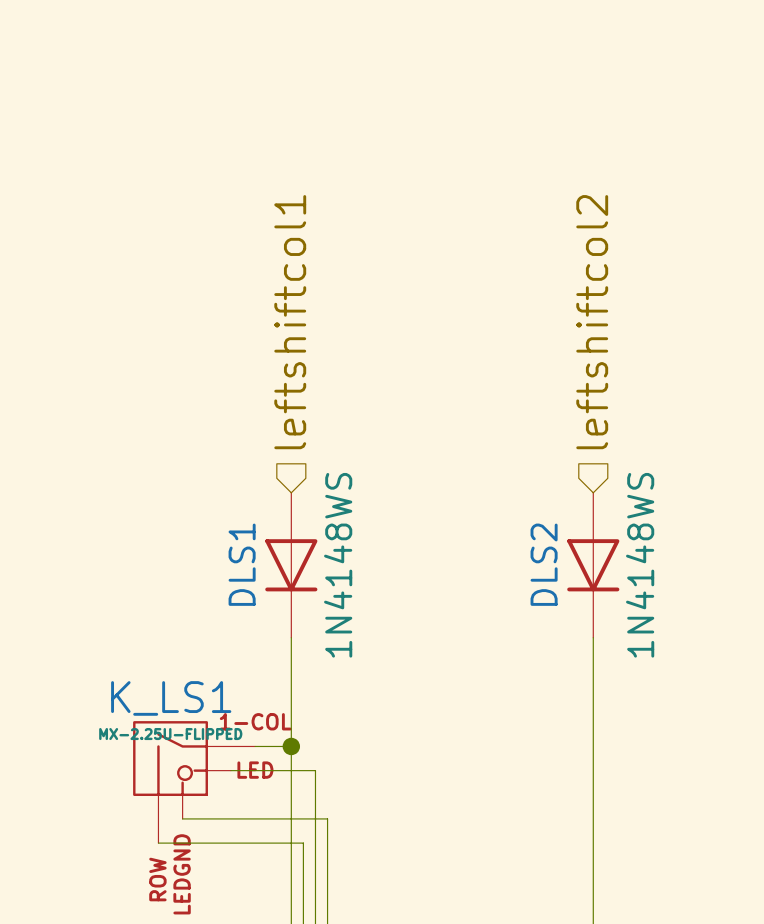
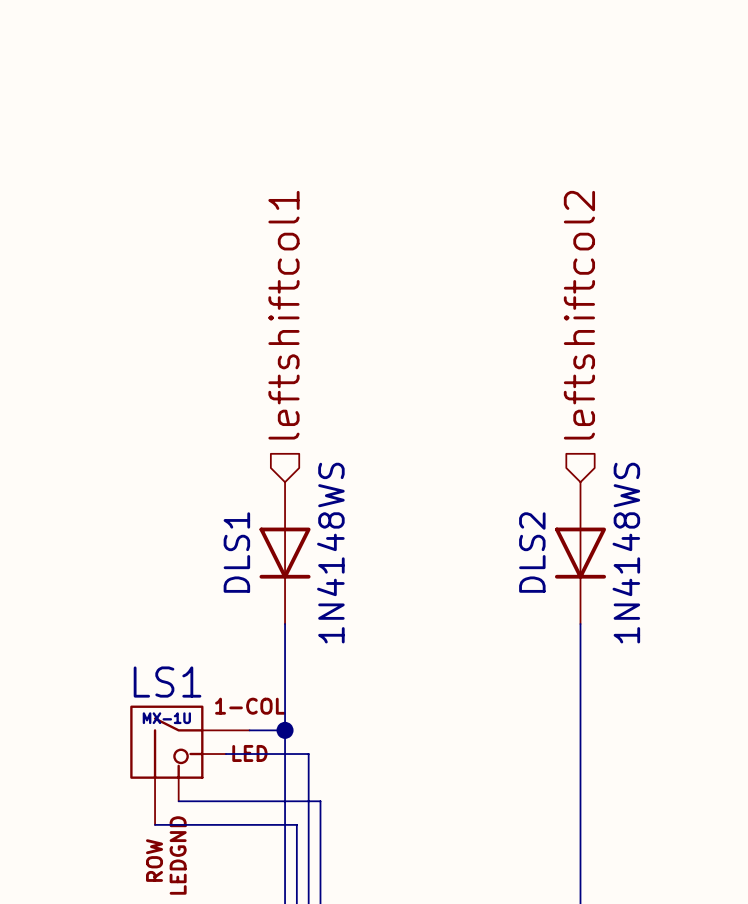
K_LS1 name: K_LS1 (171, 698) -> LS1 (167, 682)
K_LS1 value: MX-2.25U-FLIPPED (170, 734) -> MX-1U (166, 718)

